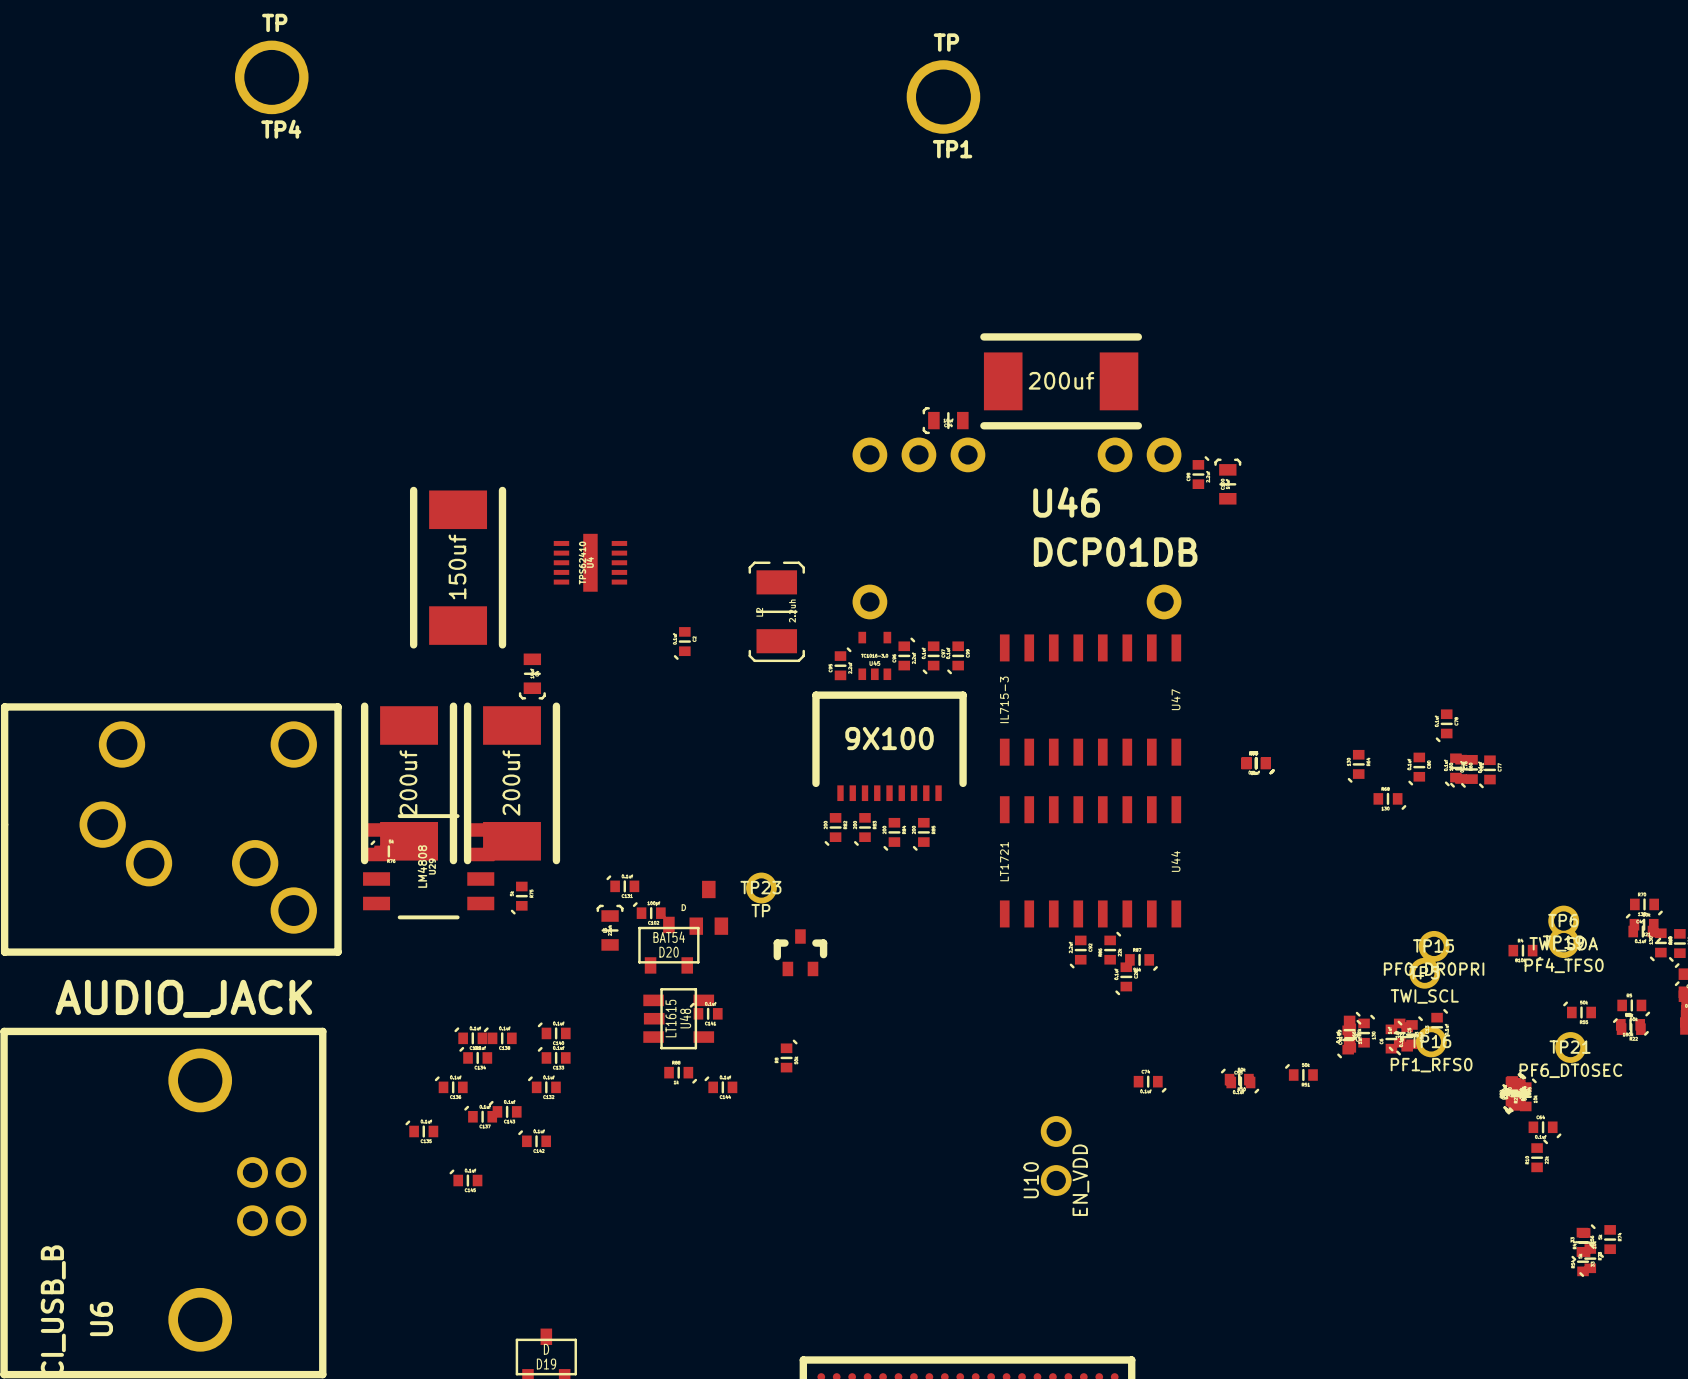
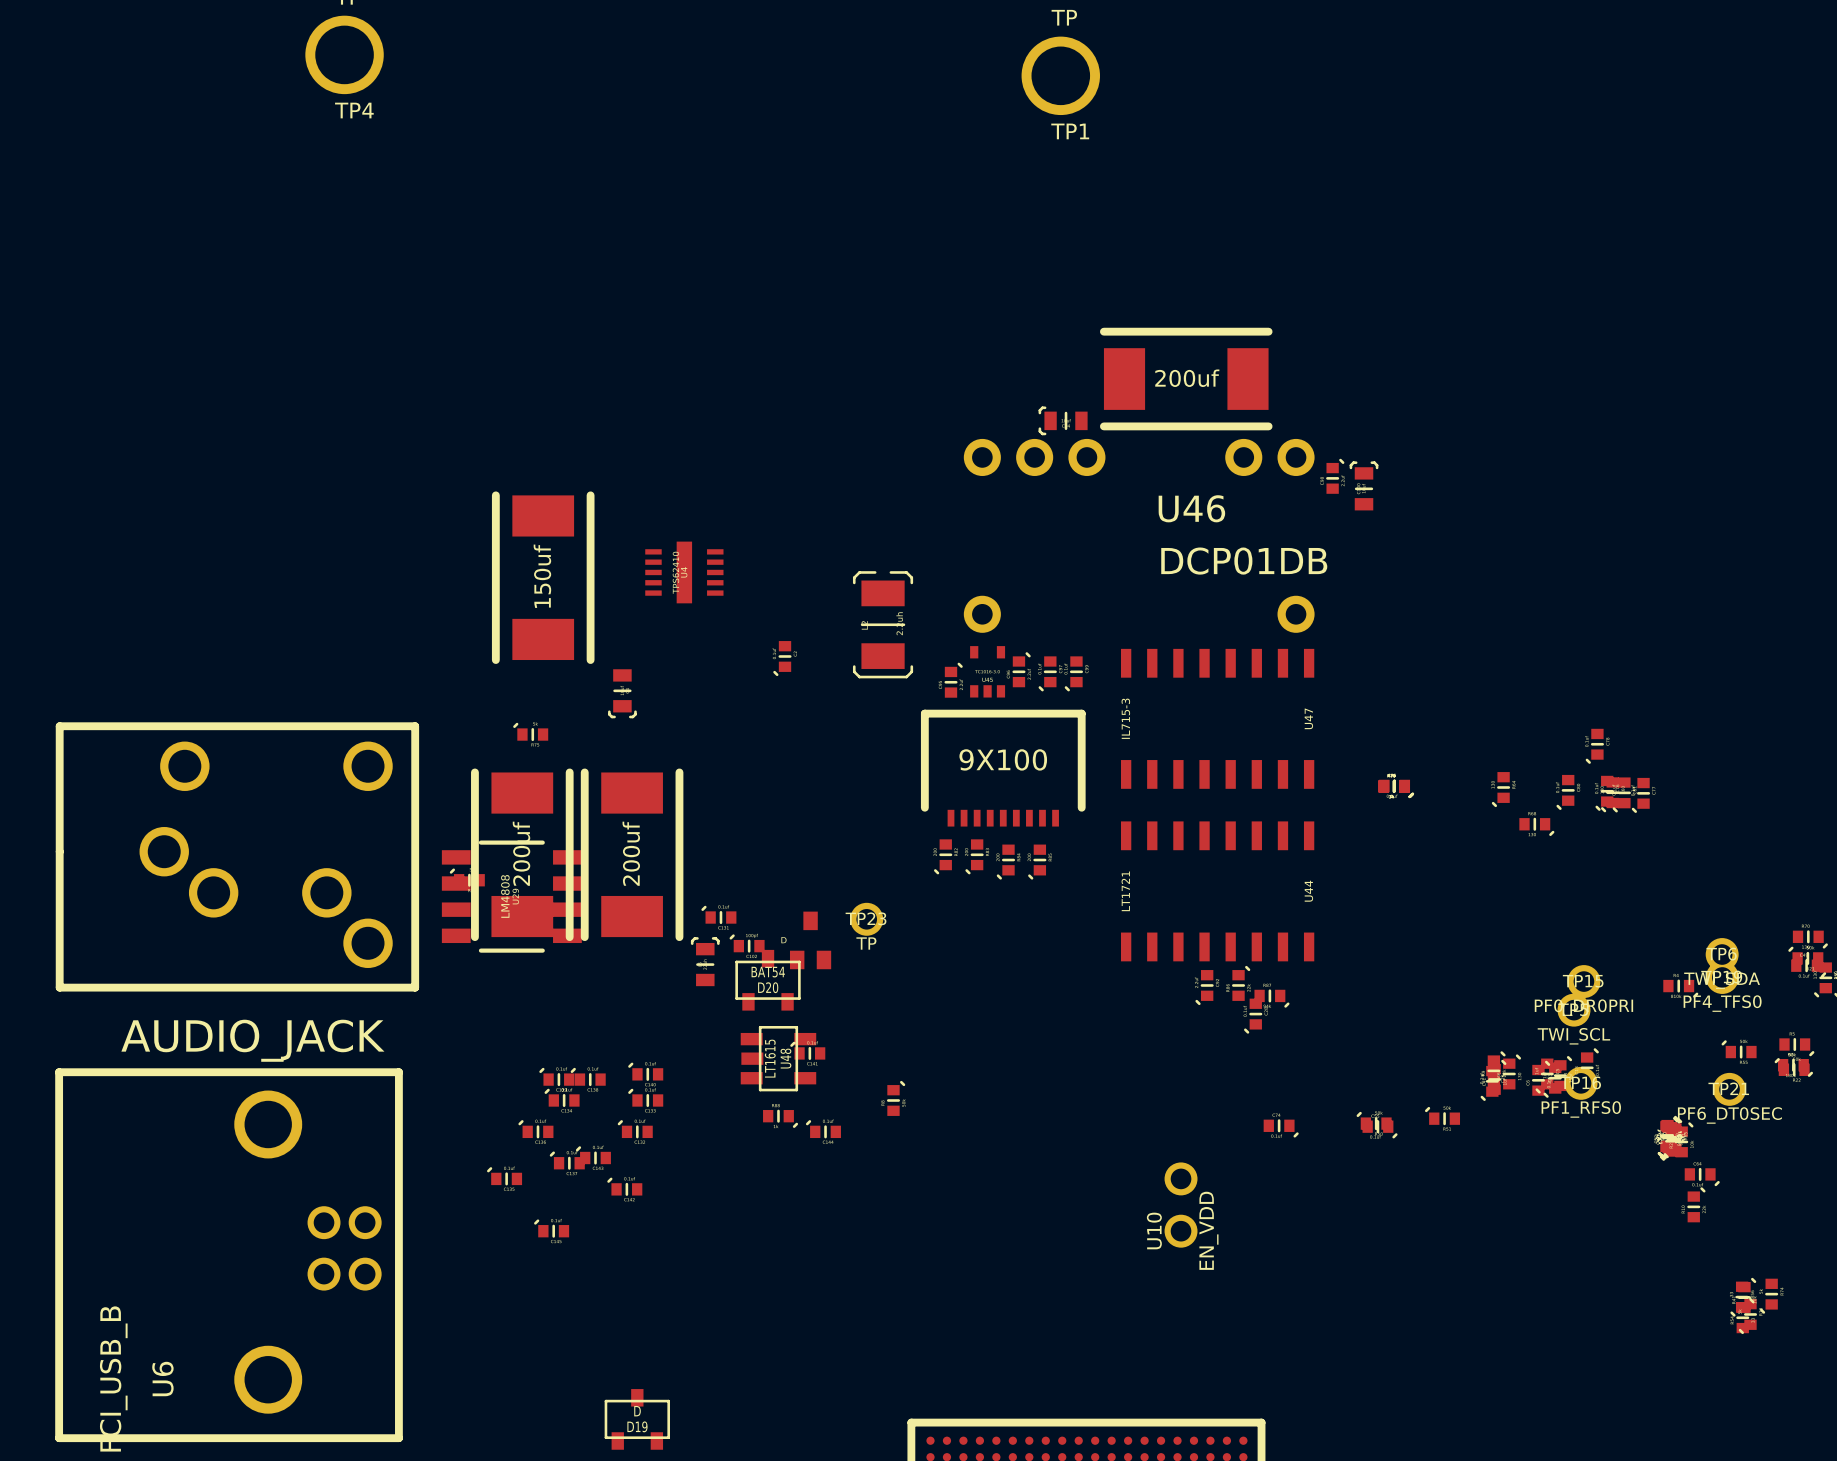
part: 200uf (409, 783) -> none
part: 200uf (512, 783) -> none
part: none -> 200uf (522, 854)
part: none -> 200uf (632, 854)
part rotation: 0° (519, 898) -> 90° clockwise (530, 731)
part position: (519, 898) -> (530, 731)
part: (800, 952) -> none

